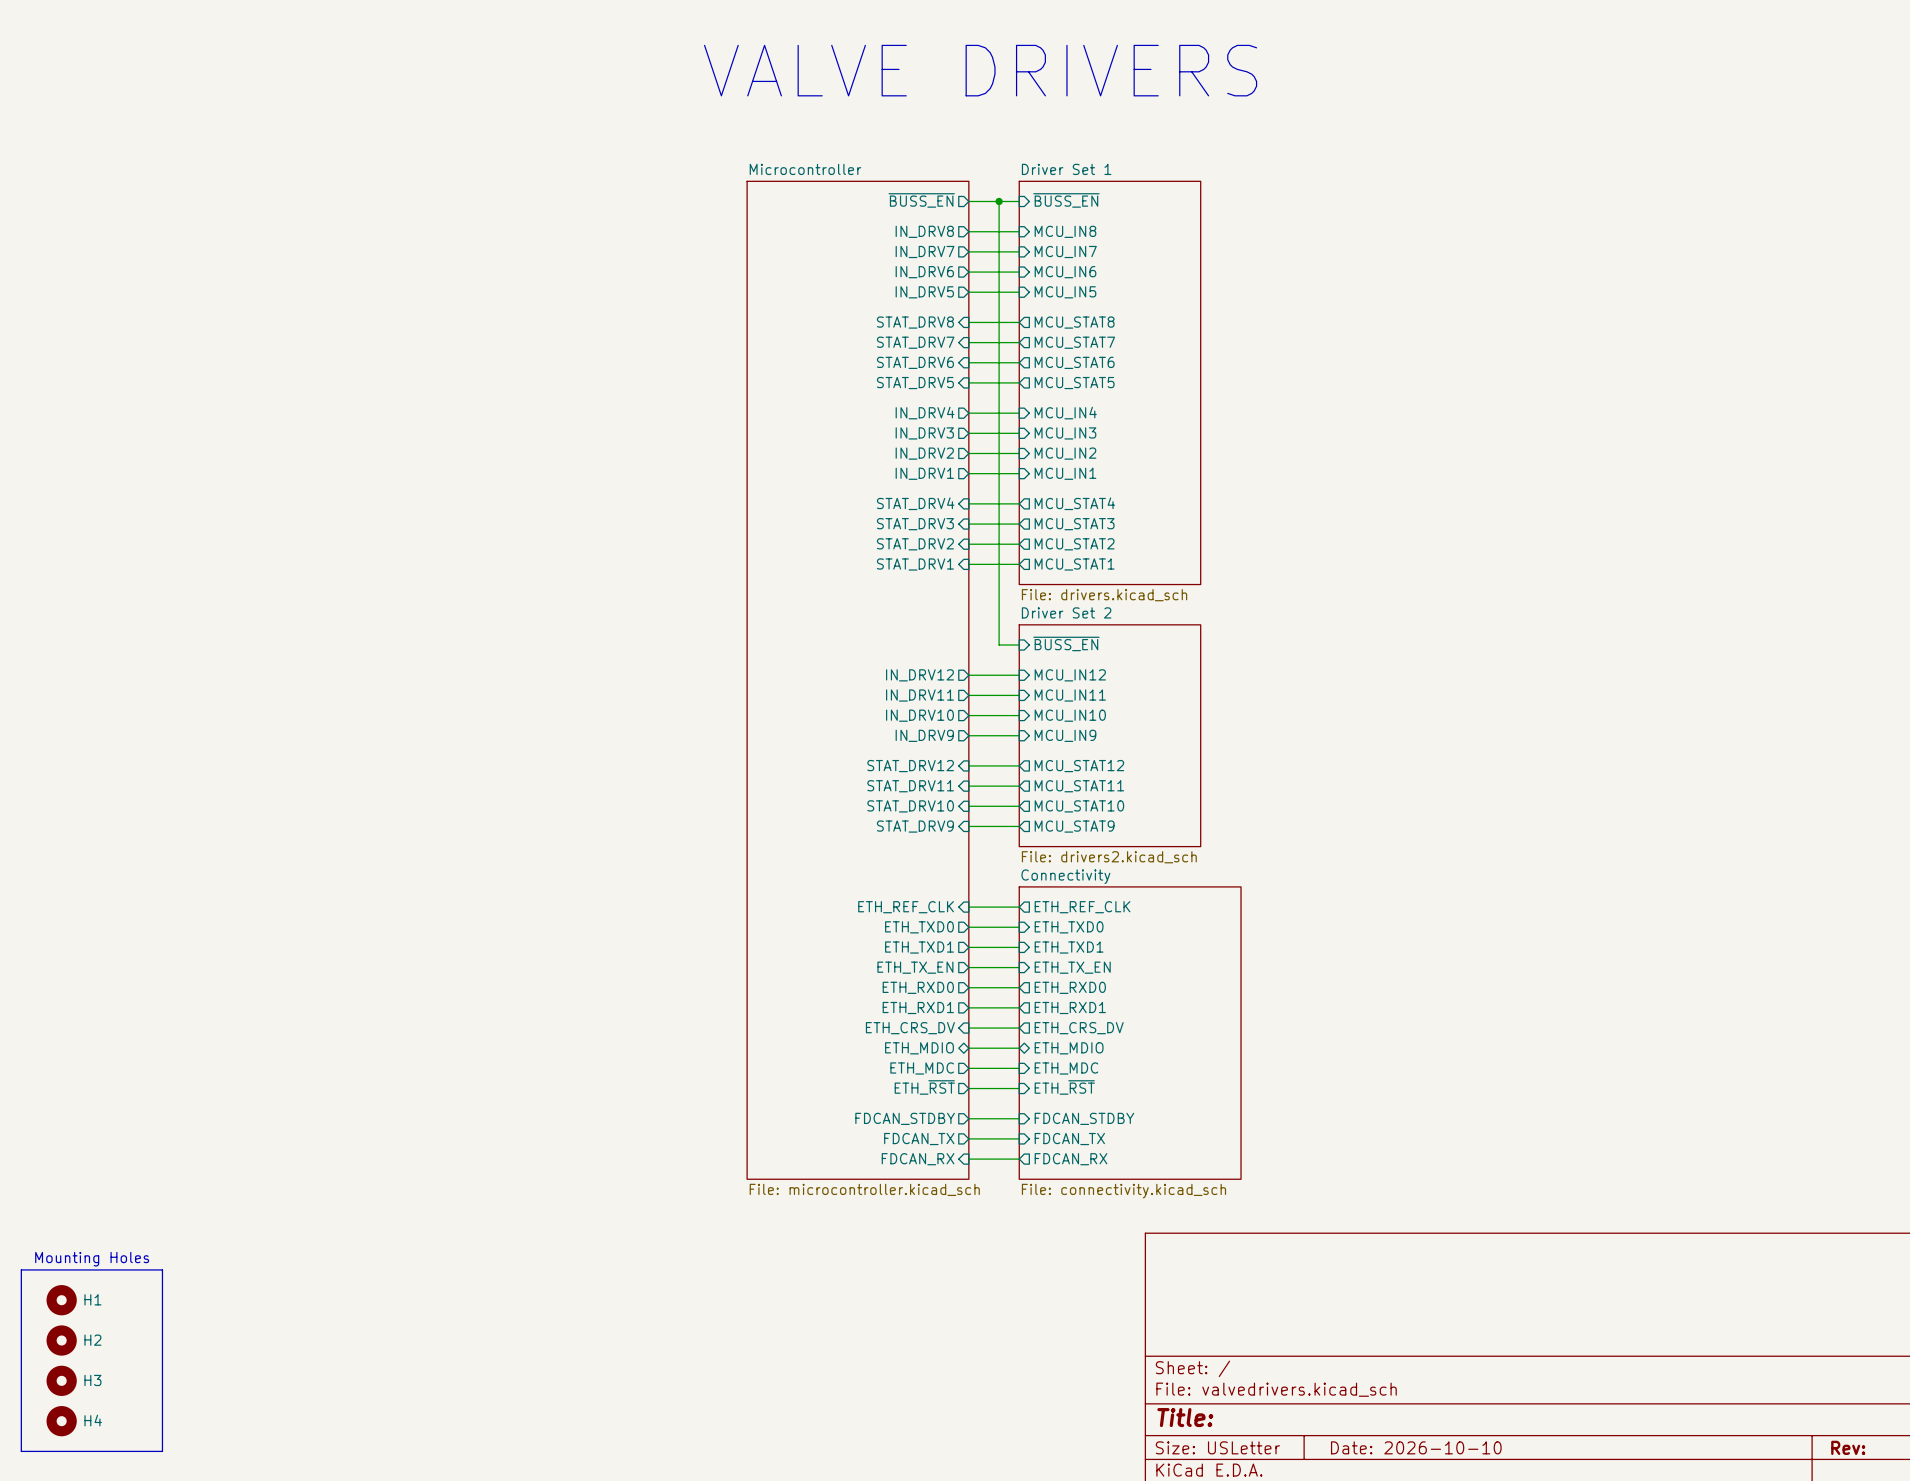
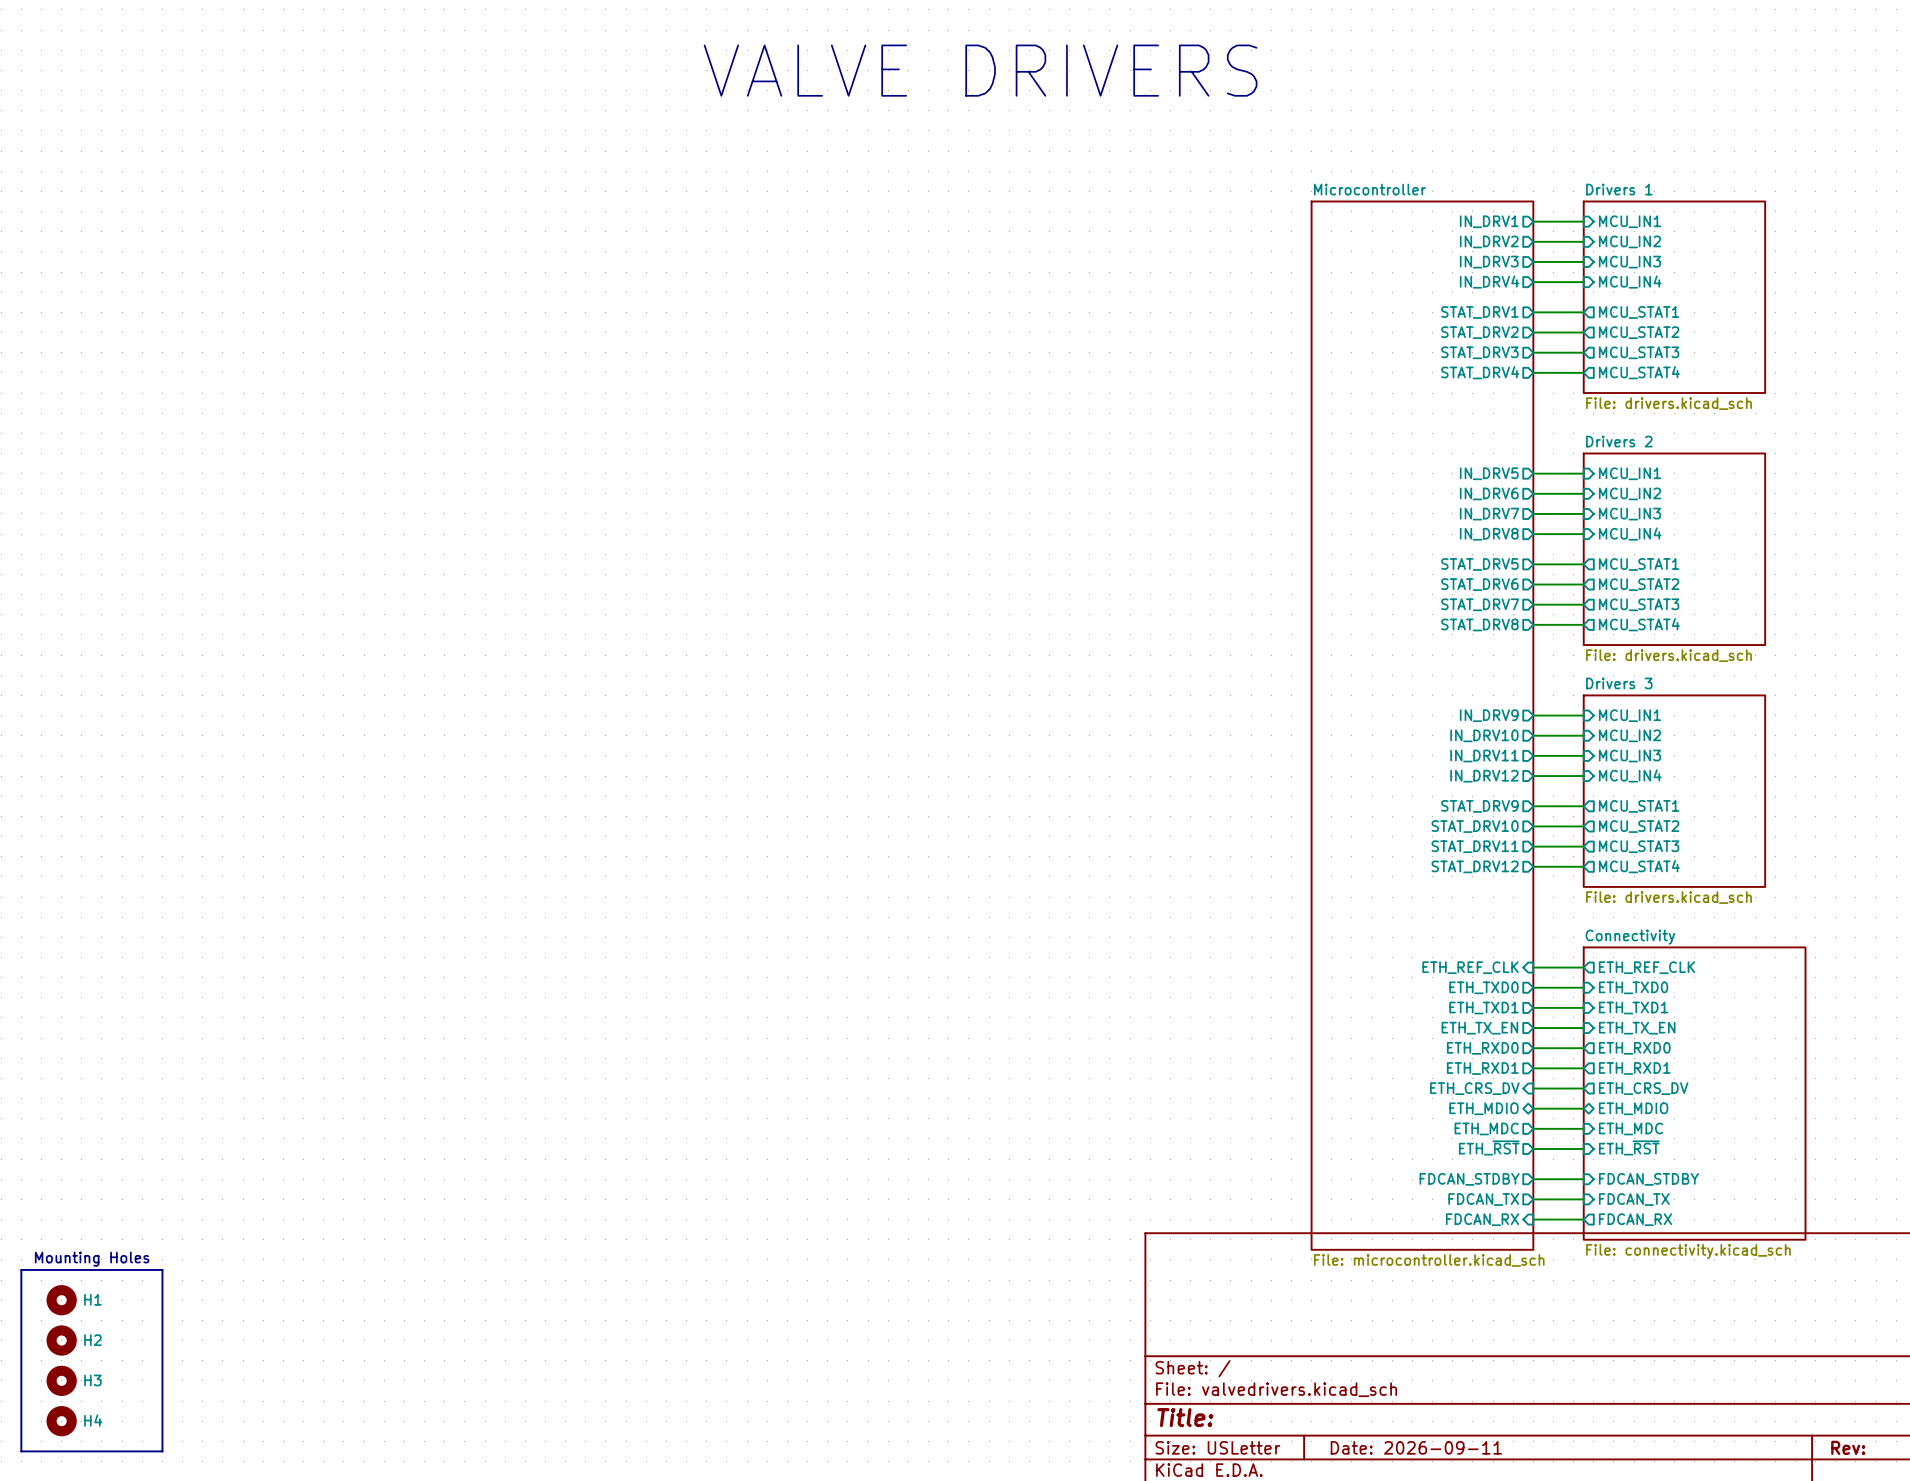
sheet pin: ~{BUSS_EN} (921, 200) -> none
sheet pin: ~{BUSS_EN} (1066, 200) -> none
wire: (968, 201) (1019, 201) -> none
wire: (999, 201) (999, 645) (1019, 645) -> none
junction: (999, 201) -> none
sheet pin: none -> IN_DRV1 (1489, 221)
wire: none -> (1533, 221) (1583, 221)
sheet pin: none -> MCU_IN1 (1629, 221)
sheet pin: IN_DRV8 (924, 231) -> none
wire: (968, 231) (1019, 231) -> none
sheet pin: MCU_IN8 (1065, 231) -> none
sheet pin: none -> IN_DRV2 (1489, 241)
wire: none -> (1533, 241) (1583, 241)
sheet pin: none -> MCU_IN2 (1629, 241)
sheet pin: IN_DRV7 (925, 251) -> none
wire: (968, 251) (1019, 251) -> none
sheet pin: MCU_IN7 (1065, 251) -> none
wire: none -> (1533, 261) (1583, 261)
sheet pin: none -> IN_DRV3 (1489, 262)
sheet pin: none -> MCU_IN3 (1629, 262)
sheet pin: IN_DRV6 (924, 272) -> none
wire: (968, 272) (1019, 272) -> none
sheet pin: MCU_IN6 (1065, 272) -> none
sheet pin: none -> IN_DRV4 (1489, 281)
sheet pin: none -> MCU_IN4 (1630, 281)
wire: none -> (1533, 282) (1583, 282)
sheet pin: IN_DRV5 (924, 292) -> none
wire: (968, 292) (1019, 292) -> none
sheet pin: MCU_IN5 (1065, 292) -> none
sheet Drivers 1: none -> File: drivers.kicad_sch (1674, 297)
sheet pin: none -> STAT_DRV1 (1479, 312)
wire: none -> (1533, 312) (1583, 312)
sheet pin: none -> MCU_STAT1 (1639, 312)
sheet pin: STAT_DRV8 (915, 322) -> none
wire: (968, 322) (1019, 322) -> none
sheet pin: MCU_STAT8 (1074, 322) -> none
sheet pin: none -> STAT_DRV2 (1479, 332)
wire: none -> (1533, 332) (1583, 332)
sheet pin: none -> MCU_STAT2 (1639, 332)
sheet pin: STAT_DRV7 (915, 342) -> none
wire: (968, 342) (1019, 342) -> none
sheet pin: MCU_STAT7 (1074, 342) -> none
sheet pin: none -> STAT_DRV3 (1479, 352)
wire: none -> (1533, 352) (1583, 352)
sheet pin: none -> MCU_STAT3 (1639, 352)
sheet pin: STAT_DRV6 (915, 362) -> none
wire: (968, 362) (1019, 362) -> none
sheet pin: MCU_STAT6 (1074, 362) -> none
sheet pin: none -> STAT_DRV4 (1480, 372)
wire: none -> (1533, 372) (1583, 372)
sheet pin: none -> MCU_STAT4 (1639, 372)
wire: (968, 382) (1019, 382) -> none
sheet Driver Set 1: File: drivers.kicad_sch (1109, 382) -> none
sheet pin: STAT_DRV5 (915, 383) -> none
sheet pin: MCU_STAT5 (1074, 383) -> none
sheet pin: IN_DRV4 (925, 413) -> none
wire: (968, 413) (1019, 413) -> none
sheet pin: MCU_IN4 (1065, 413) -> none
sheet pin: IN_DRV3 (924, 433) -> none
wire: (968, 433) (1019, 433) -> none
sheet pin: MCU_IN3 (1065, 433) -> none
sheet pin: IN_DRV2 (924, 453) -> none
wire: (968, 453) (1019, 453) -> none
sheet pin: MCU_IN2 (1065, 453) -> none
sheet pin: IN_DRV1 (924, 473) -> none
wire: (968, 473) (1019, 473) -> none
sheet pin: MCU_IN1 (1065, 473) -> none
sheet pin: none -> IN_DRV5 (1489, 473)
wire: none -> (1533, 473) (1583, 473)
sheet pin: none -> MCU_IN1 (1629, 473)
sheet pin: none -> IN_DRV6 (1489, 493)
wire: none -> (1533, 493) (1583, 493)
sheet pin: none -> MCU_IN2 (1629, 493)
sheet pin: STAT_DRV4 (915, 503) -> none
wire: (968, 503) (1019, 503) -> none
sheet pin: MCU_STAT4 (1074, 503) -> none
wire: none -> (1533, 513) (1583, 513)
sheet pin: none -> IN_DRV7 (1489, 514)
sheet pin: none -> MCU_IN3 (1629, 514)
sheet pin: STAT_DRV3 (915, 524) -> none
wire: (968, 524) (1019, 524) -> none
sheet pin: MCU_STAT3 (1074, 524) -> none
sheet pin: none -> MCU_IN4 (1630, 533)
sheet pin: none -> IN_DRV8 (1489, 534)
wire: none -> (1533, 534) (1583, 534)
sheet pin: STAT_DRV2 (915, 544) -> none
wire: (968, 544) (1019, 544) -> none
sheet pin: MCU_STAT2 (1074, 544) -> none
sheet Drivers 2: none -> File: drivers.kicad_sch (1674, 549)
sheet pin: STAT_DRV1 (915, 564) -> none
wire: (968, 564) (1019, 564) -> none
sheet pin: MCU_STAT1 (1074, 564) -> none
sheet pin: none -> STAT_DRV5 (1479, 564)
wire: none -> (1533, 564) (1583, 564)
sheet pin: none -> MCU_STAT1 (1639, 564)
sheet pin: none -> STAT_DRV6 (1479, 584)
wire: none -> (1533, 584) (1583, 584)
sheet pin: none -> MCU_STAT2 (1639, 584)
sheet pin: none -> STAT_DRV7 (1480, 604)
wire: none -> (1533, 604) (1583, 604)
sheet pin: none -> MCU_STAT3 (1639, 604)
sheet pin: none -> STAT_DRV8 (1479, 624)
wire: none -> (1533, 624) (1583, 624)
sheet pin: none -> MCU_STAT4 (1639, 624)
sheet pin: ~{BUSS_EN} (1066, 643) -> none
sheet pin: IN_DRV12 (919, 675) -> none
wire: (968, 675) (1019, 675) -> none
sheet pin: MCU_IN12 (1070, 675) -> none
sheet Microcontroller: File: microcontroller.kicad_sch (857, 680) -> none
sheet pin: IN_DRV11 (919, 695) -> none
wire: (968, 695) (1019, 695) -> none
sheet pin: MCU_IN11 (1070, 695) -> none
sheet pin: IN_DRV10 (919, 715) -> none
wire: (968, 715) (1019, 715) -> none
sheet pin: MCU_IN10 (1070, 715) -> none
sheet pin: none -> IN_DRV9 (1489, 715)
wire: none -> (1533, 715) (1583, 715)
sheet pin: none -> MCU_IN1 (1629, 715)
sheet Microcontroller: none -> File: microcontroller.kicad_sch (1422, 725)
sheet pin: IN_DRV9 (924, 735) -> none
wire: (968, 735) (1019, 735) -> none
sheet pin: MCU_IN9 (1065, 735) -> none
sheet Driver Set 2: File: drivers2.kicad_sch (1109, 735) -> none
sheet pin: none -> IN_DRV10 (1484, 735)
wire: none -> (1533, 735) (1583, 735)
sheet pin: none -> MCU_IN2 (1629, 735)
sheet pin: none -> IN_DRV11 (1484, 755)
wire: none -> (1533, 755) (1583, 755)
sheet pin: none -> MCU_IN3 (1629, 755)
wire: (968, 765) (1019, 765) -> none
sheet pin: STAT_DRV12 (910, 766) -> none
sheet pin: MCU_STAT12 (1079, 766) -> none
sheet pin: none -> MCU_IN4 (1630, 775)
sheet pin: none -> IN_DRV12 (1484, 776)
wire: none -> (1533, 776) (1583, 776)
sheet pin: STAT_DRV11 (910, 786) -> none
wire: (968, 786) (1019, 786) -> none
sheet pin: MCU_STAT11 (1079, 786) -> none
sheet Drivers 3: none -> File: drivers.kicad_sch (1674, 791)
sheet pin: STAT_DRV10 (910, 806) -> none
wire: (968, 806) (1019, 806) -> none
sheet pin: MCU_STAT10 (1079, 806) -> none
sheet pin: none -> STAT_DRV9 (1479, 806)
wire: none -> (1533, 806) (1583, 806)
sheet pin: none -> MCU_STAT1 (1639, 806)
sheet pin: STAT_DRV9 (915, 826) -> none
wire: (968, 826) (1019, 826) -> none
sheet pin: MCU_STAT9 (1074, 826) -> none
sheet pin: none -> STAT_DRV10 (1475, 826)
wire: none -> (1533, 826) (1583, 826)
sheet pin: none -> MCU_STAT2 (1639, 826)
sheet pin: none -> STAT_DRV11 (1475, 846)
wire: none -> (1533, 846) (1583, 846)
sheet pin: none -> MCU_STAT3 (1639, 846)
sheet pin: none -> STAT_DRV12 (1475, 866)
wire: none -> (1533, 866) (1583, 866)
sheet pin: none -> MCU_STAT4 (1639, 866)
sheet pin: ETH_REF_CLK (906, 907) -> none
wire: (968, 907) (1019, 907) -> none
sheet pin: ETH_REF_CLK (1082, 907) -> none
sheet pin: ETH_TXD0 (919, 927) -> none
wire: (968, 927) (1019, 927) -> none
sheet pin: ETH_TXD0 (1069, 927) -> none
sheet pin: ETH_TXD1 (919, 947) -> none
wire: (968, 947) (1019, 947) -> none
sheet pin: ETH_TXD1 (1069, 947) -> none
sheet pin: ETH_TX_EN (915, 967) -> none
wire: (968, 967) (1019, 967) -> none
sheet pin: ETH_TX_EN (1072, 967) -> none
sheet pin: none -> ETH_REF_CLK (1470, 967)
wire: none -> (1533, 967) (1583, 967)
sheet pin: none -> ETH_REF_CLK (1647, 967)
sheet pin: ETH_RXD0 (918, 987) -> none
wire: (968, 987) (1019, 987) -> none
sheet pin: ETH_RXD0 (1070, 987) -> none
sheet pin: none -> ETH_TXD0 (1483, 987)
wire: none -> (1533, 987) (1583, 987)
sheet pin: none -> ETH_TXD0 (1633, 987)
sheet pin: ETH_RXD1 (918, 1007) -> none
wire: (968, 1007) (1019, 1007) -> none
sheet pin: ETH_RXD1 (1070, 1007) -> none
sheet pin: none -> ETH_TXD1 (1483, 1007)
wire: none -> (1533, 1007) (1583, 1007)
sheet pin: none -> ETH_TXD1 (1633, 1007)
sheet pin: ETH_CRS_DV (910, 1028) -> none
wire: (968, 1028) (1019, 1028) -> none
sheet pin: ETH_CRS_DV (1079, 1028) -> none
sheet pin: none -> ETH_TX_EN (1479, 1028)
wire: none -> (1533, 1028) (1583, 1028)
sheet pin: none -> ETH_TX_EN (1637, 1028)
sheet Connectivity: File: connectivity.kicad_sch (1130, 1033) -> none
sheet pin: ETH_MDIO (919, 1048) -> none
wire: (968, 1048) (1019, 1048) -> none
sheet pin: ETH_MDIO (1069, 1048) -> none
sheet pin: none -> ETH_RXD0 (1482, 1048)
wire: none -> (1533, 1048) (1583, 1048)
sheet pin: none -> ETH_RXD0 (1634, 1048)
sheet pin: ETH_MDC (922, 1068) -> none
wire: (968, 1068) (1019, 1068) -> none
sheet pin: ETH_MDC (1066, 1068) -> none
sheet pin: none -> ETH_RXD1 (1482, 1068)
wire: none -> (1533, 1068) (1583, 1068)
sheet pin: none -> ETH_RXD1 (1634, 1068)
sheet pin: ETH_~{RST} (924, 1087) -> none
sheet pin: ETH_~{RST} (1064, 1087) -> none
wire: (968, 1088) (1019, 1088) -> none
sheet pin: none -> ETH_CRS_DV (1474, 1088)
wire: none -> (1533, 1088) (1583, 1088)
sheet pin: none -> ETH_CRS_DV (1643, 1088)
sheet Connectivity: none -> File: connectivity.kicad_sch (1694, 1093)
sheet pin: none -> ETH_MDIO (1483, 1108)
wire: none -> (1533, 1108) (1583, 1108)
sheet pin: none -> ETH_MDIO (1633, 1108)
sheet pin: FDCAN_STDBY (905, 1118) -> none
wire: (968, 1118) (1019, 1118) -> none
sheet pin: FDCAN_STDBY (1084, 1118) -> none
sheet pin: none -> ETH_MDC (1486, 1128)
wire: none -> (1533, 1128) (1583, 1128)
sheet pin: none -> ETH_MDC (1630, 1128)
wire: (968, 1138) (1019, 1138) -> none
sheet pin: FDCAN_TX (919, 1139) -> none
sheet pin: FDCAN_TX (1069, 1139) -> none
sheet pin: none -> ETH_~{RST} (1489, 1147)
sheet pin: none -> ETH_~{RST} (1629, 1147)
wire: none -> (1533, 1149) (1583, 1149)
sheet pin: FDCAN_RX (918, 1159) -> none
wire: (968, 1159) (1019, 1159) -> none
sheet pin: FDCAN_RX (1071, 1159) -> none
sheet pin: none -> FDCAN_STDBY (1469, 1179)
wire: none -> (1533, 1179) (1583, 1179)
sheet pin: none -> FDCAN_STDBY (1648, 1179)
sheet pin: none -> FDCAN_TX (1483, 1199)
wire: none -> (1533, 1199) (1583, 1199)
sheet pin: none -> FDCAN_TX (1634, 1199)
sheet pin: none -> FDCAN_RX (1482, 1219)
wire: none -> (1533, 1219) (1583, 1219)
sheet pin: none -> FDCAN_RX (1635, 1219)
title block: Date: 2026-10-10 (1416, 1447) -> Date: 2026-09-11 (1416, 1447)

